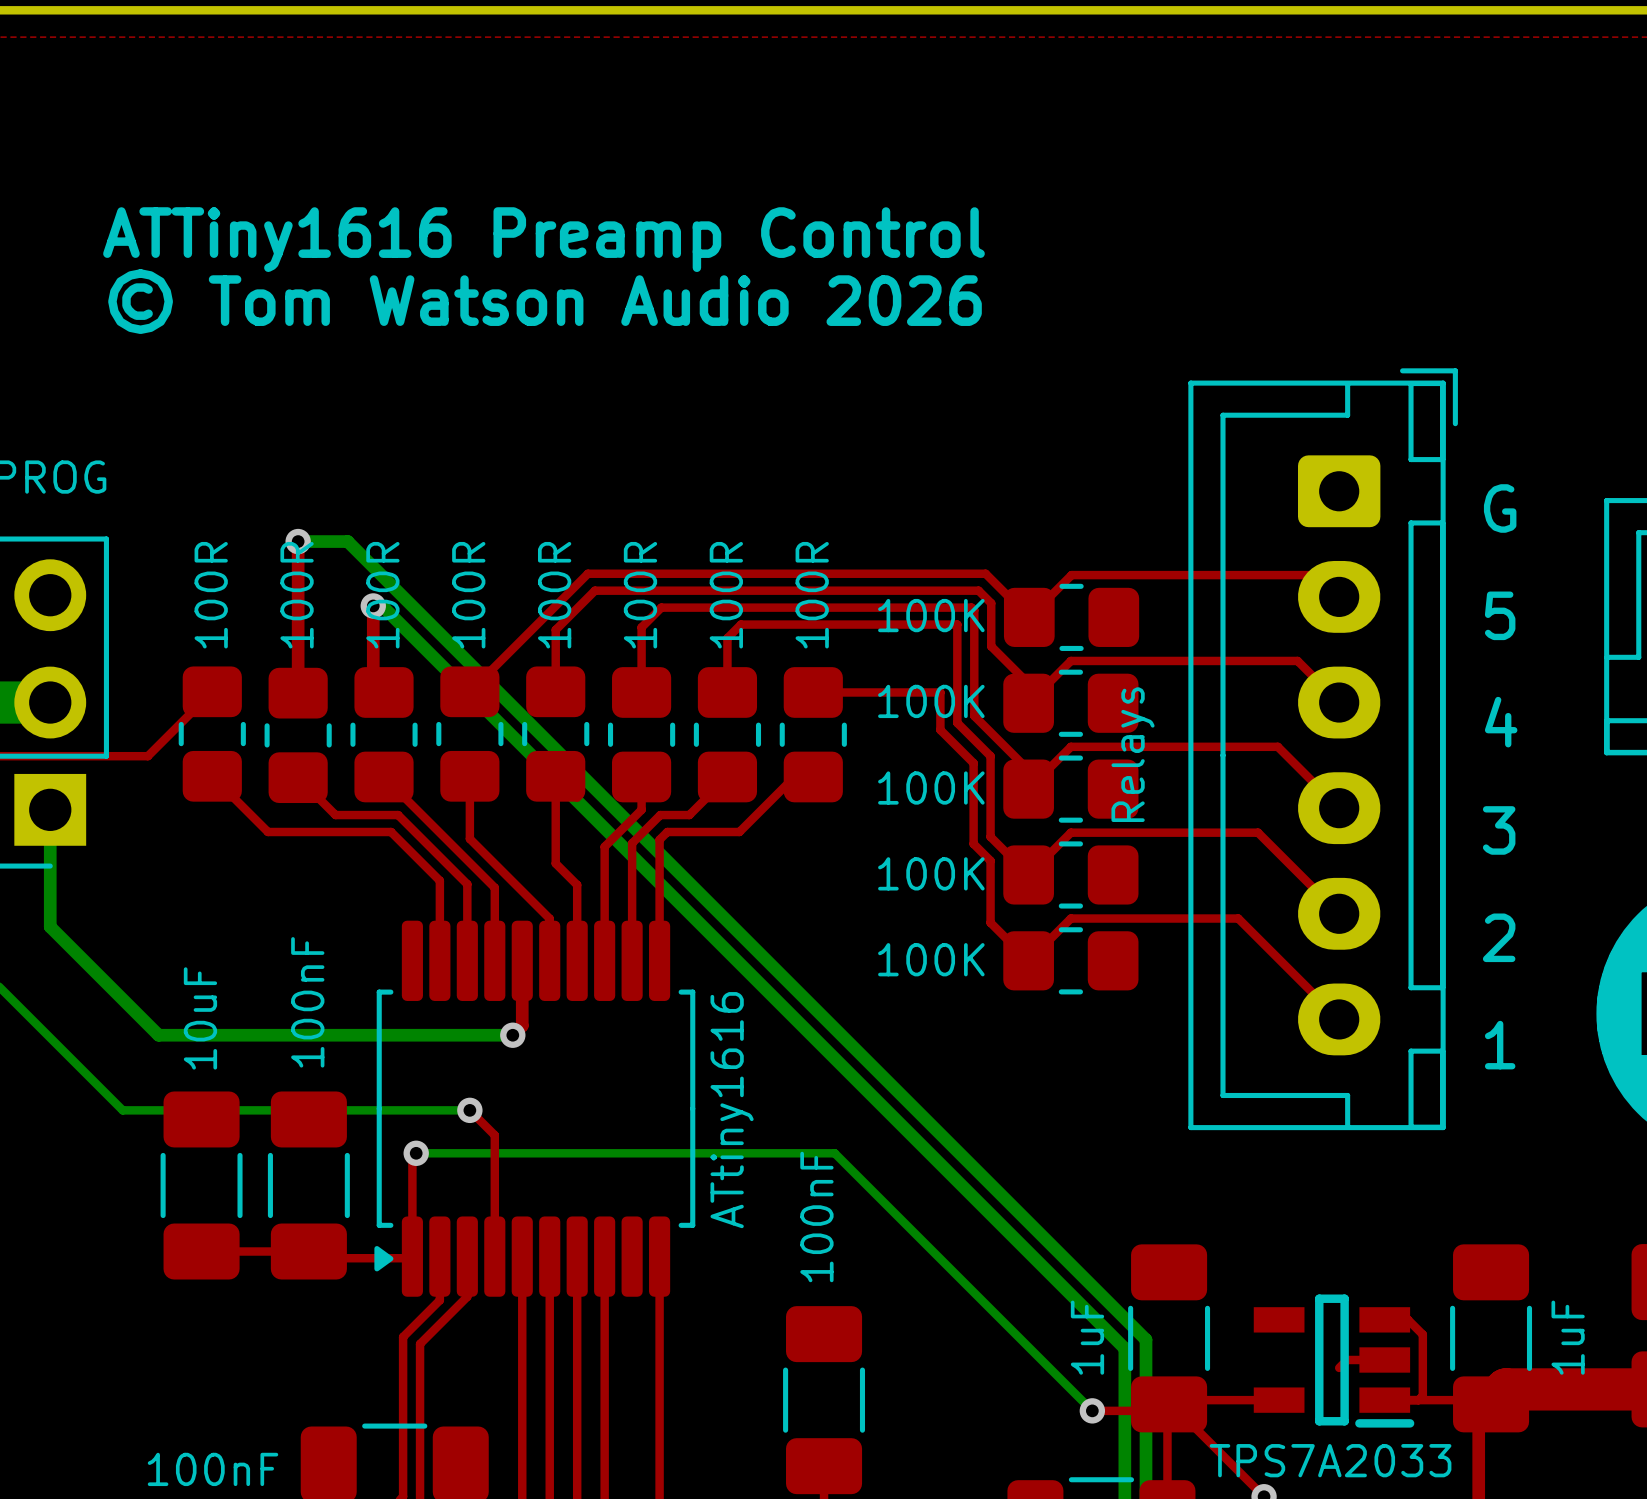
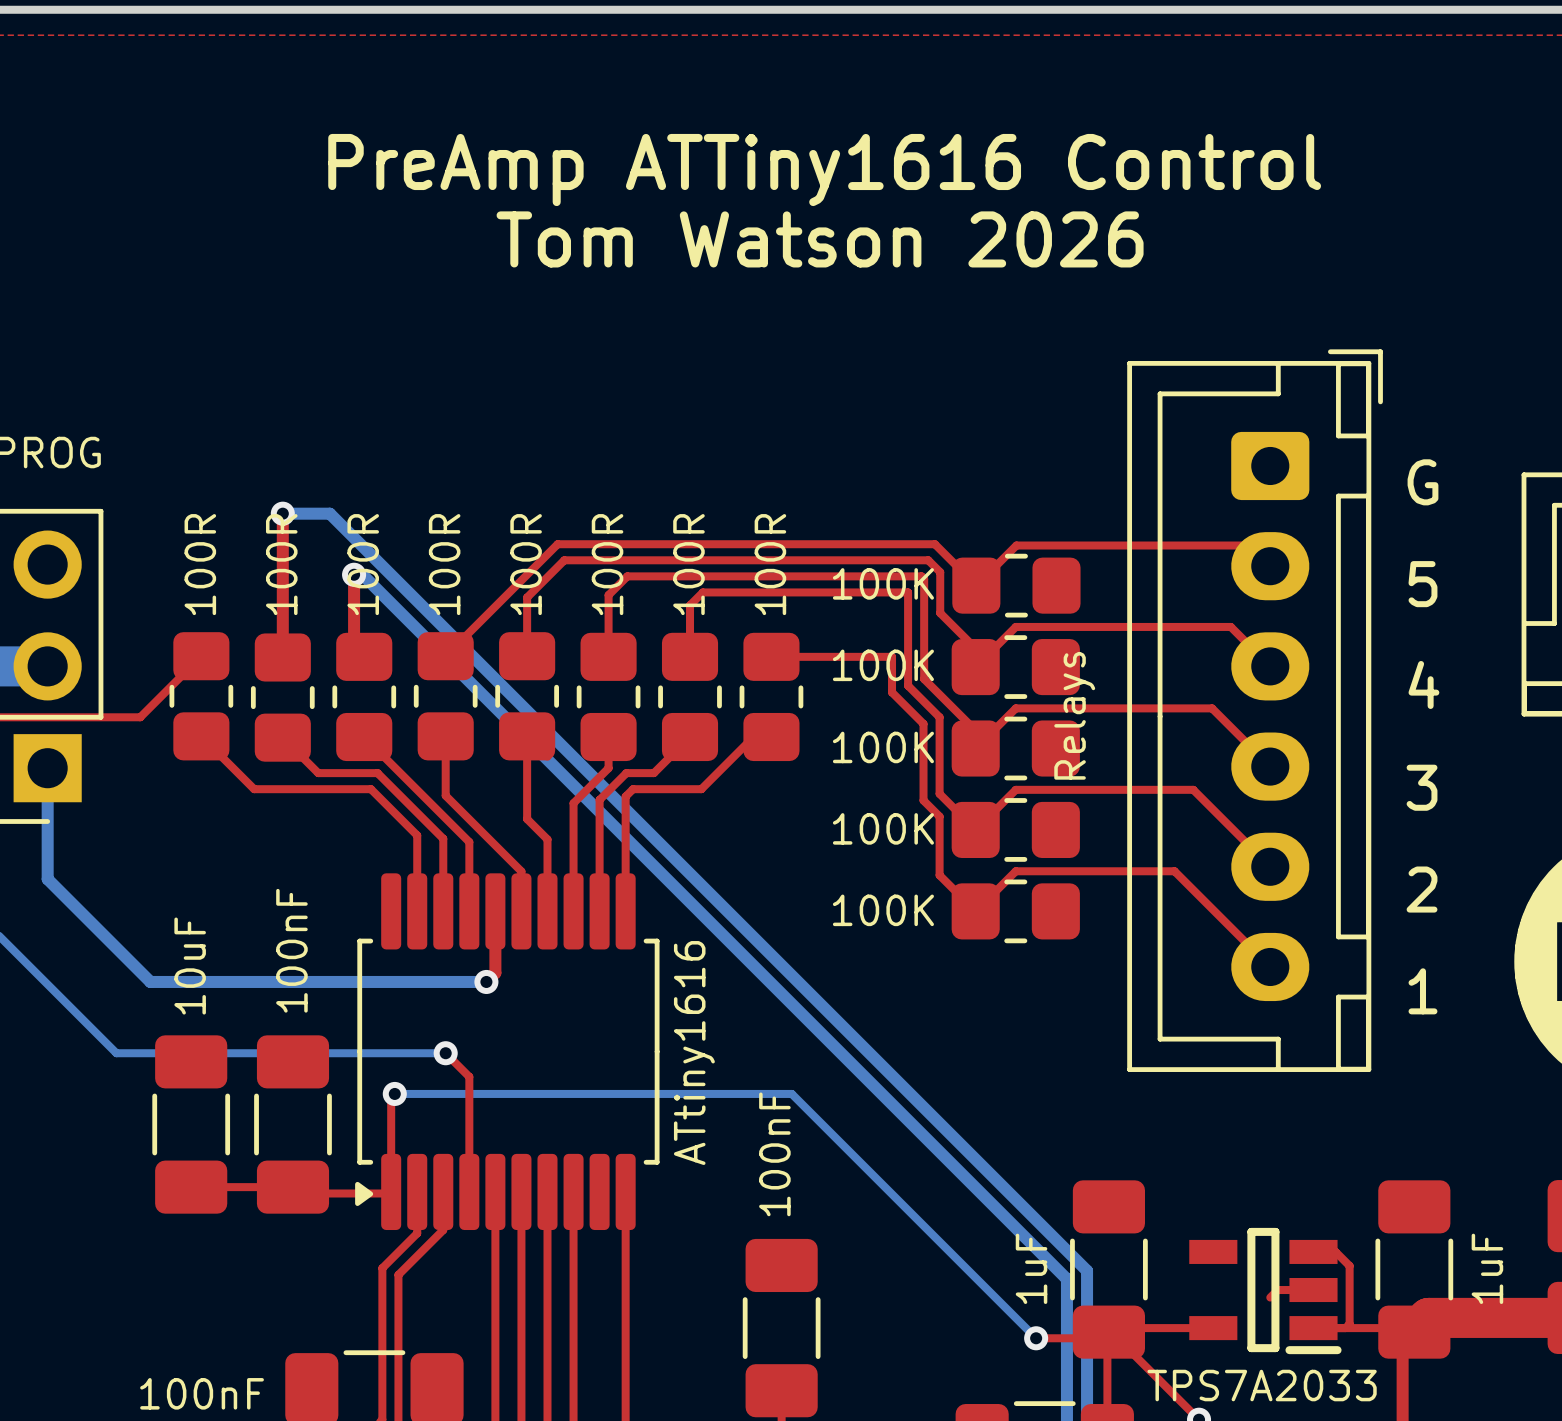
text: ATTiny1616 Preamp Control (543, 239) -> PreAmp ATTiny1616 Control (824, 170)
text: © Tom Watson Audio 2026 (545, 301) -> Tom Watson 2026 (820, 239)

